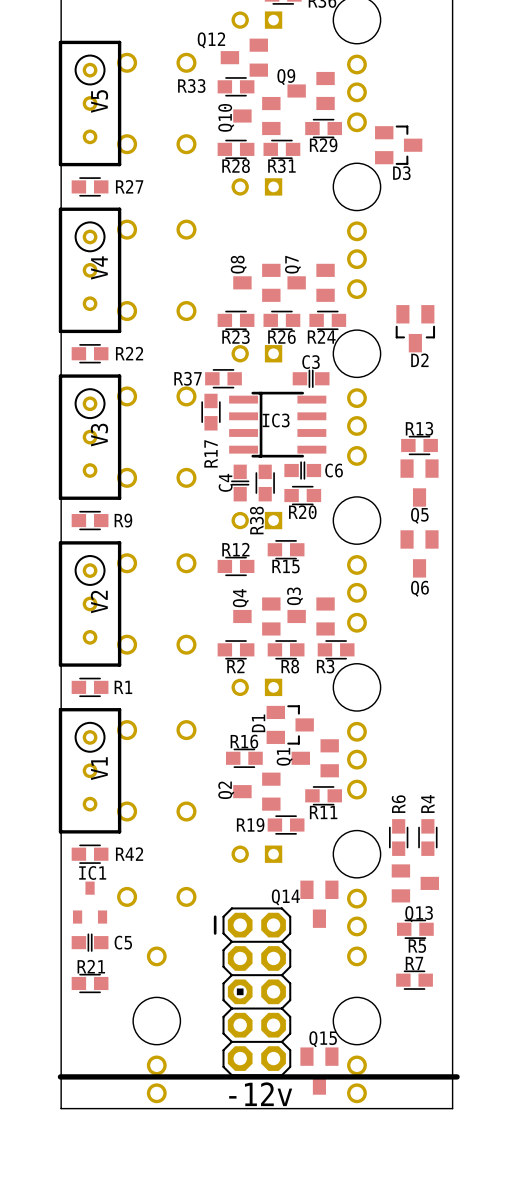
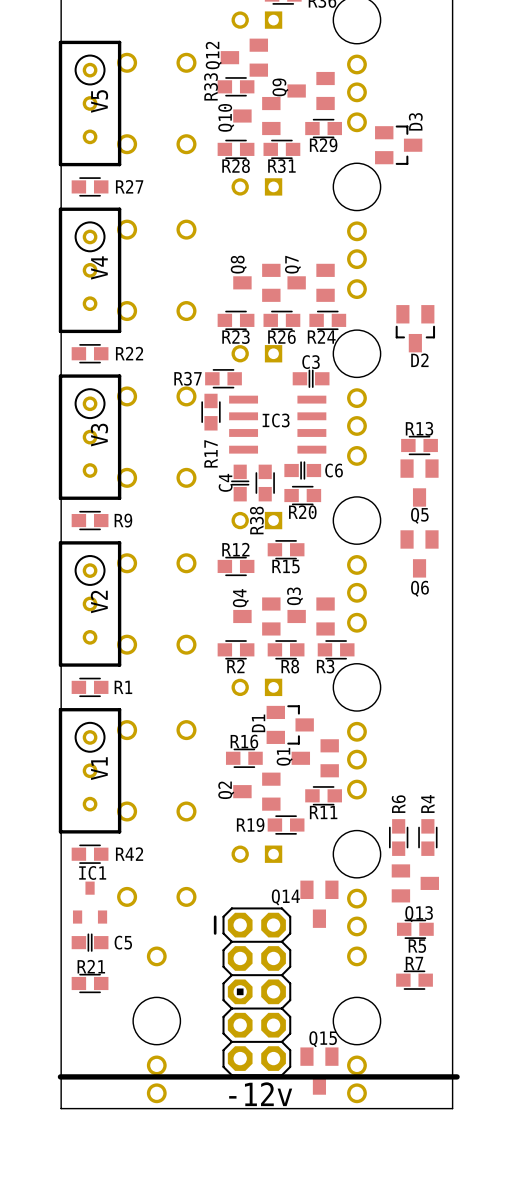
Q12 name rotation: 0° (211, 40) -> 90° counterclockwise (213, 55)
Q9 name rotation: 0° (286, 77) -> 90° counterclockwise (280, 87)
R33 name rotation: 0° (191, 85) -> 90° counterclockwise (211, 86)
D3 name rotation: 0° (401, 173) -> 90° counterclockwise (415, 121)
D3 name position: D3 (401, 173) -> D3 (415, 121)
IC3 footprint: [229, 391, 327, 458] -> [229, 395, 327, 454]

